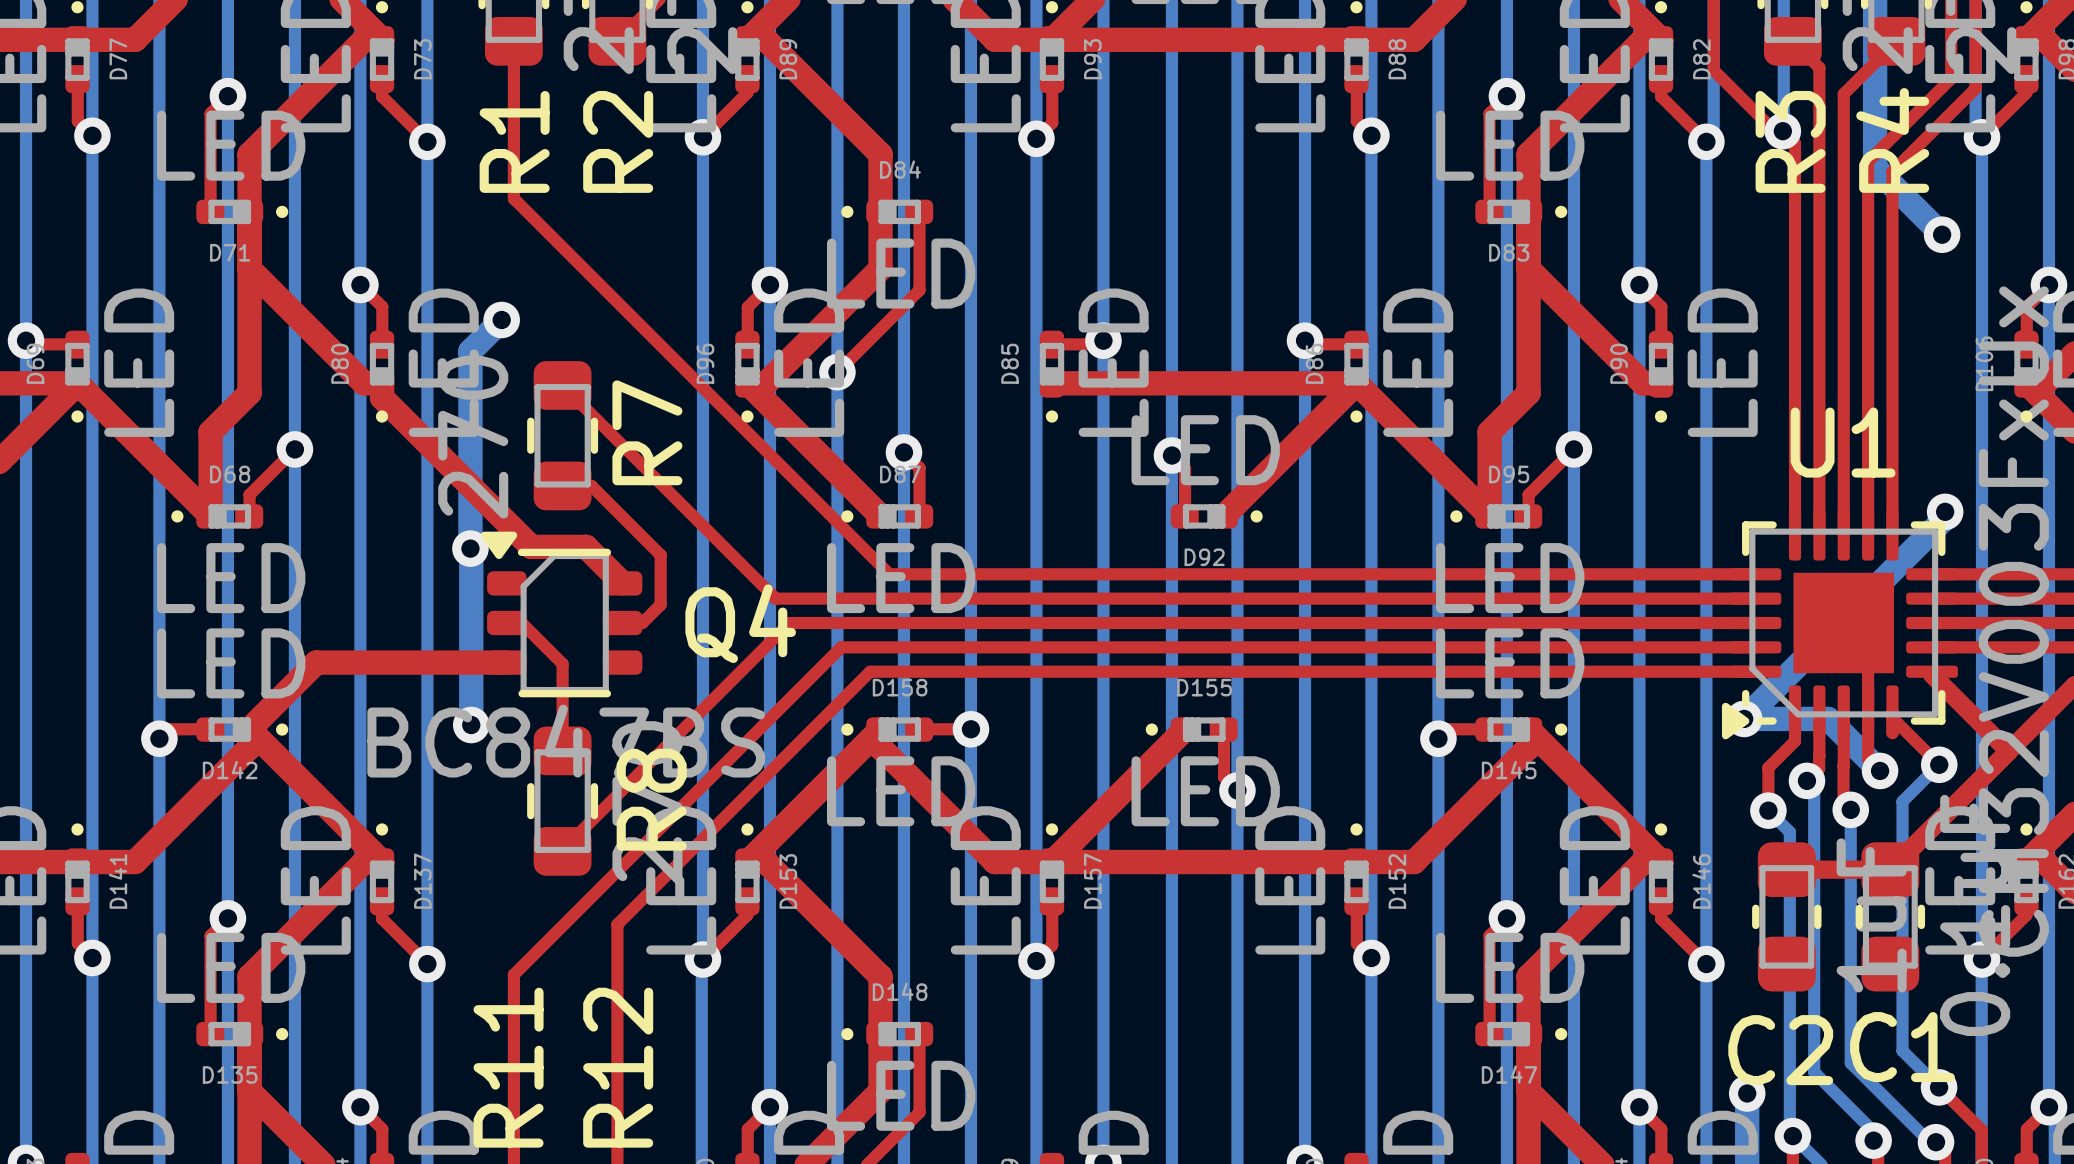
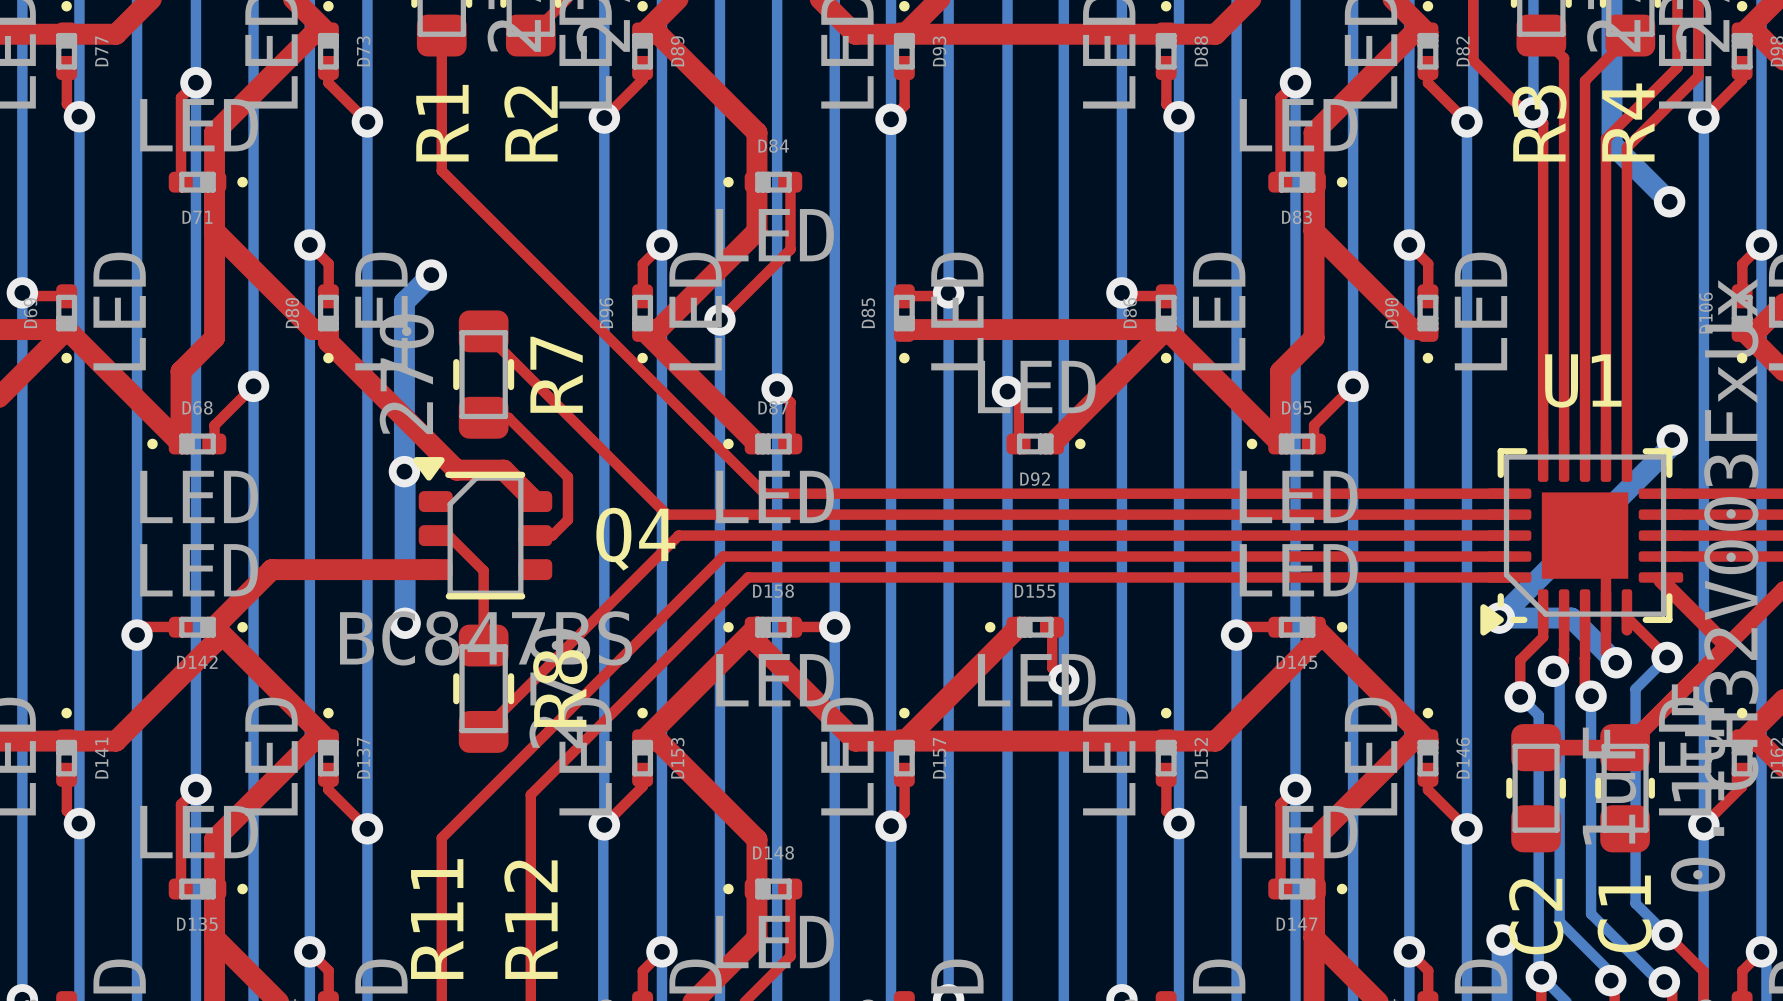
C1 name rotation: 0° (1902, 1047) -> 90° counterclockwise (1624, 913)
C2 name rotation: 0° (1780, 1050) -> 90° counterclockwise (1536, 916)

